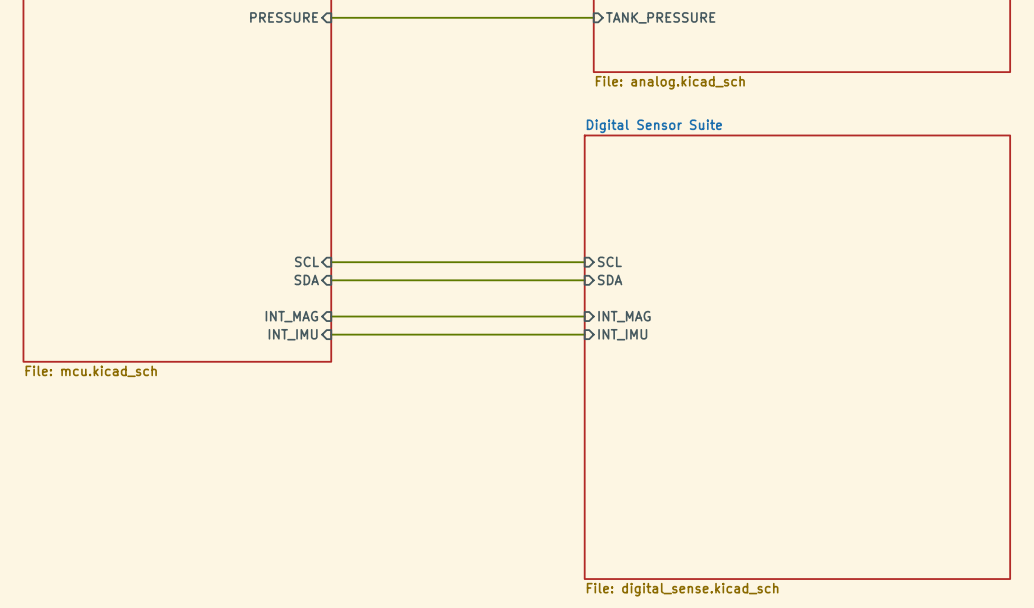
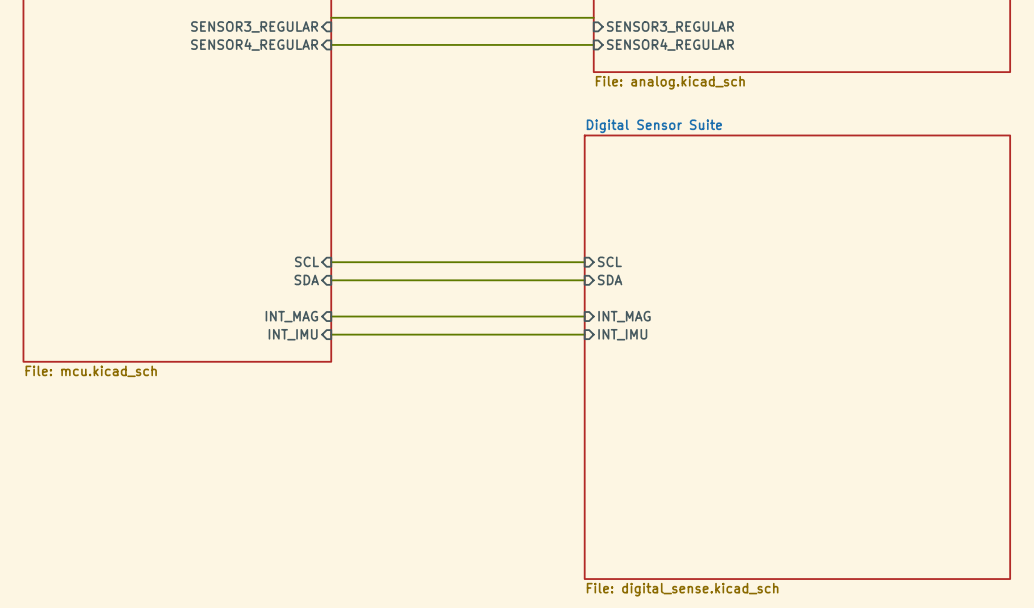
sheet pin: PRESSURE (284, 17) -> none
sheet pin: TANK_PRESSURE (660, 17) -> none
sheet pin: none -> SENSOR3_REGULAR (254, 26)
sheet pin: none -> SENSOR3_REGULAR (670, 26)
sheet pin: none -> SENSOR4_REGULAR (254, 44)
wire: none -> (331, 44) (593, 44)
sheet pin: none -> SENSOR4_REGULAR (670, 44)

